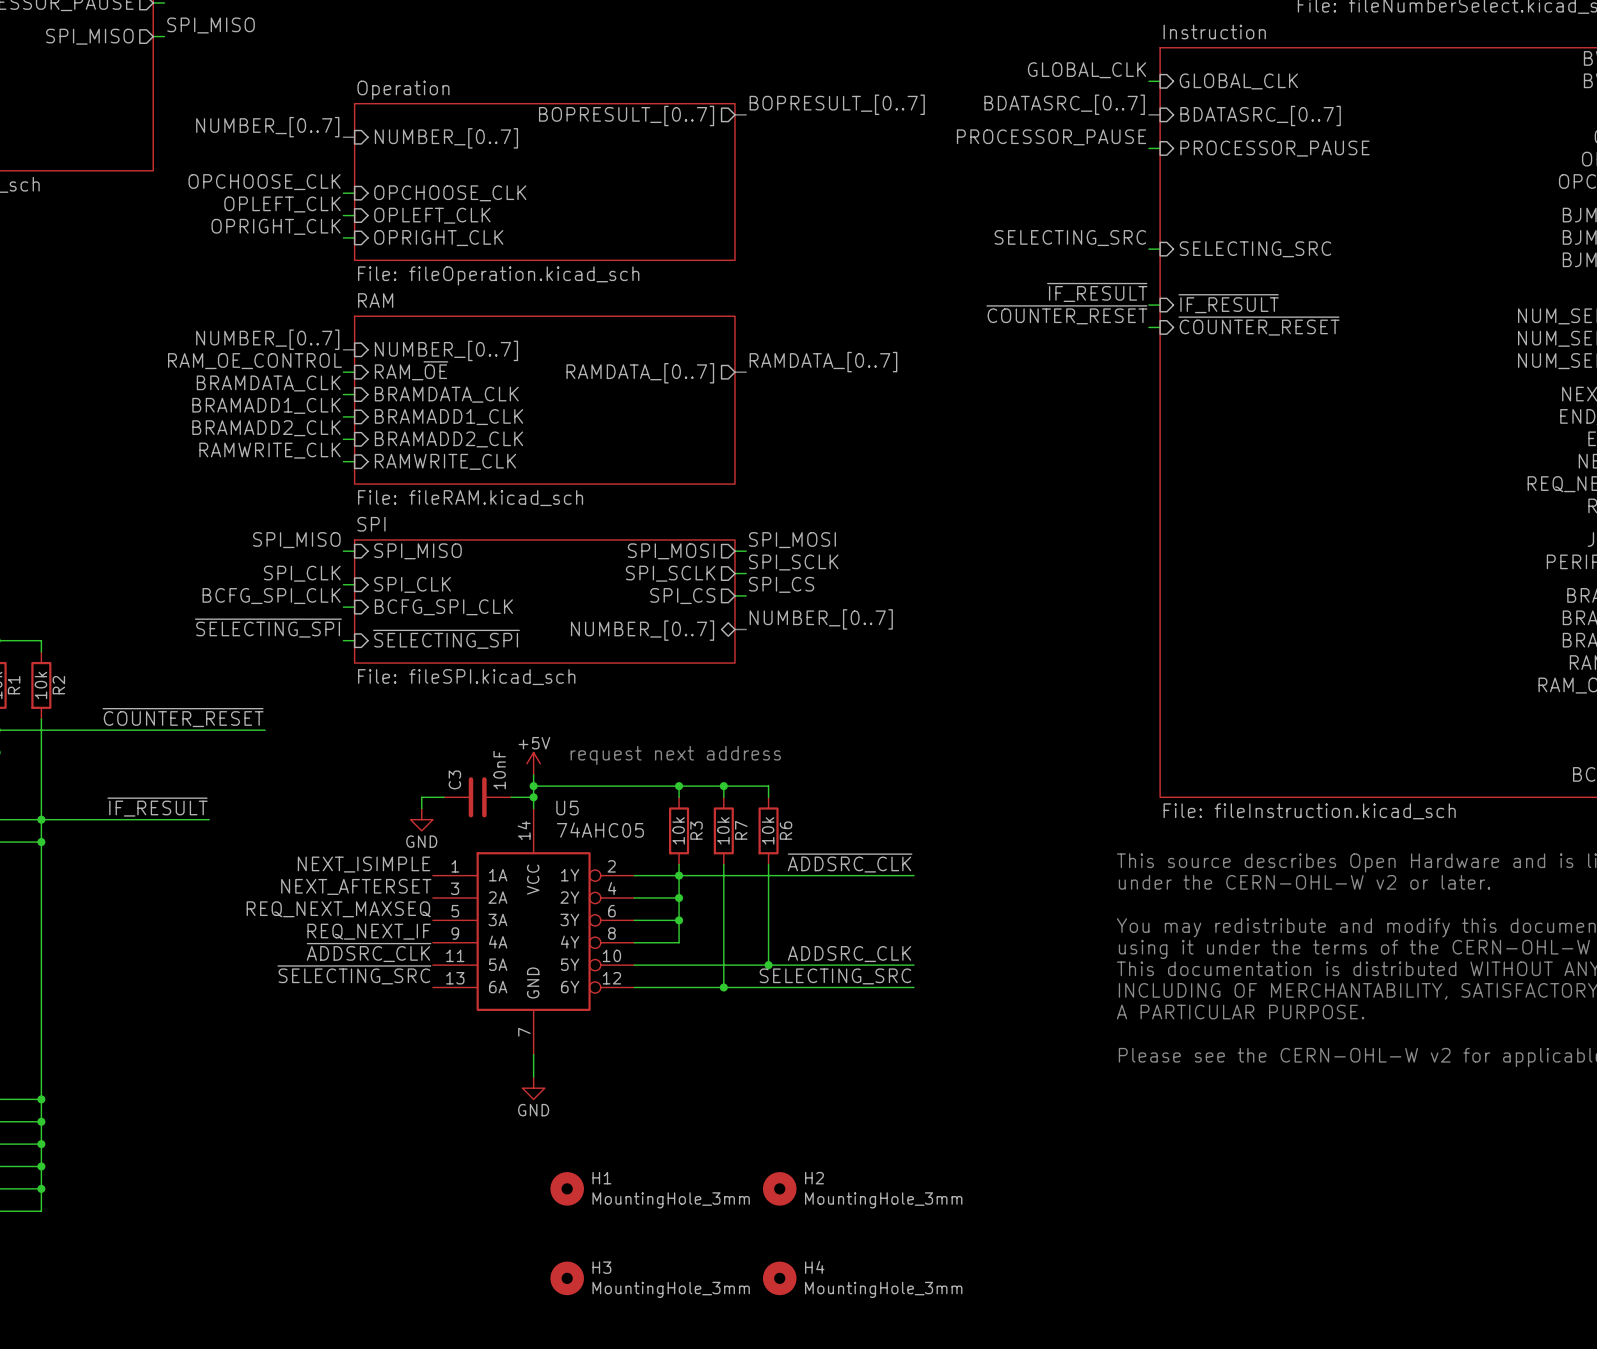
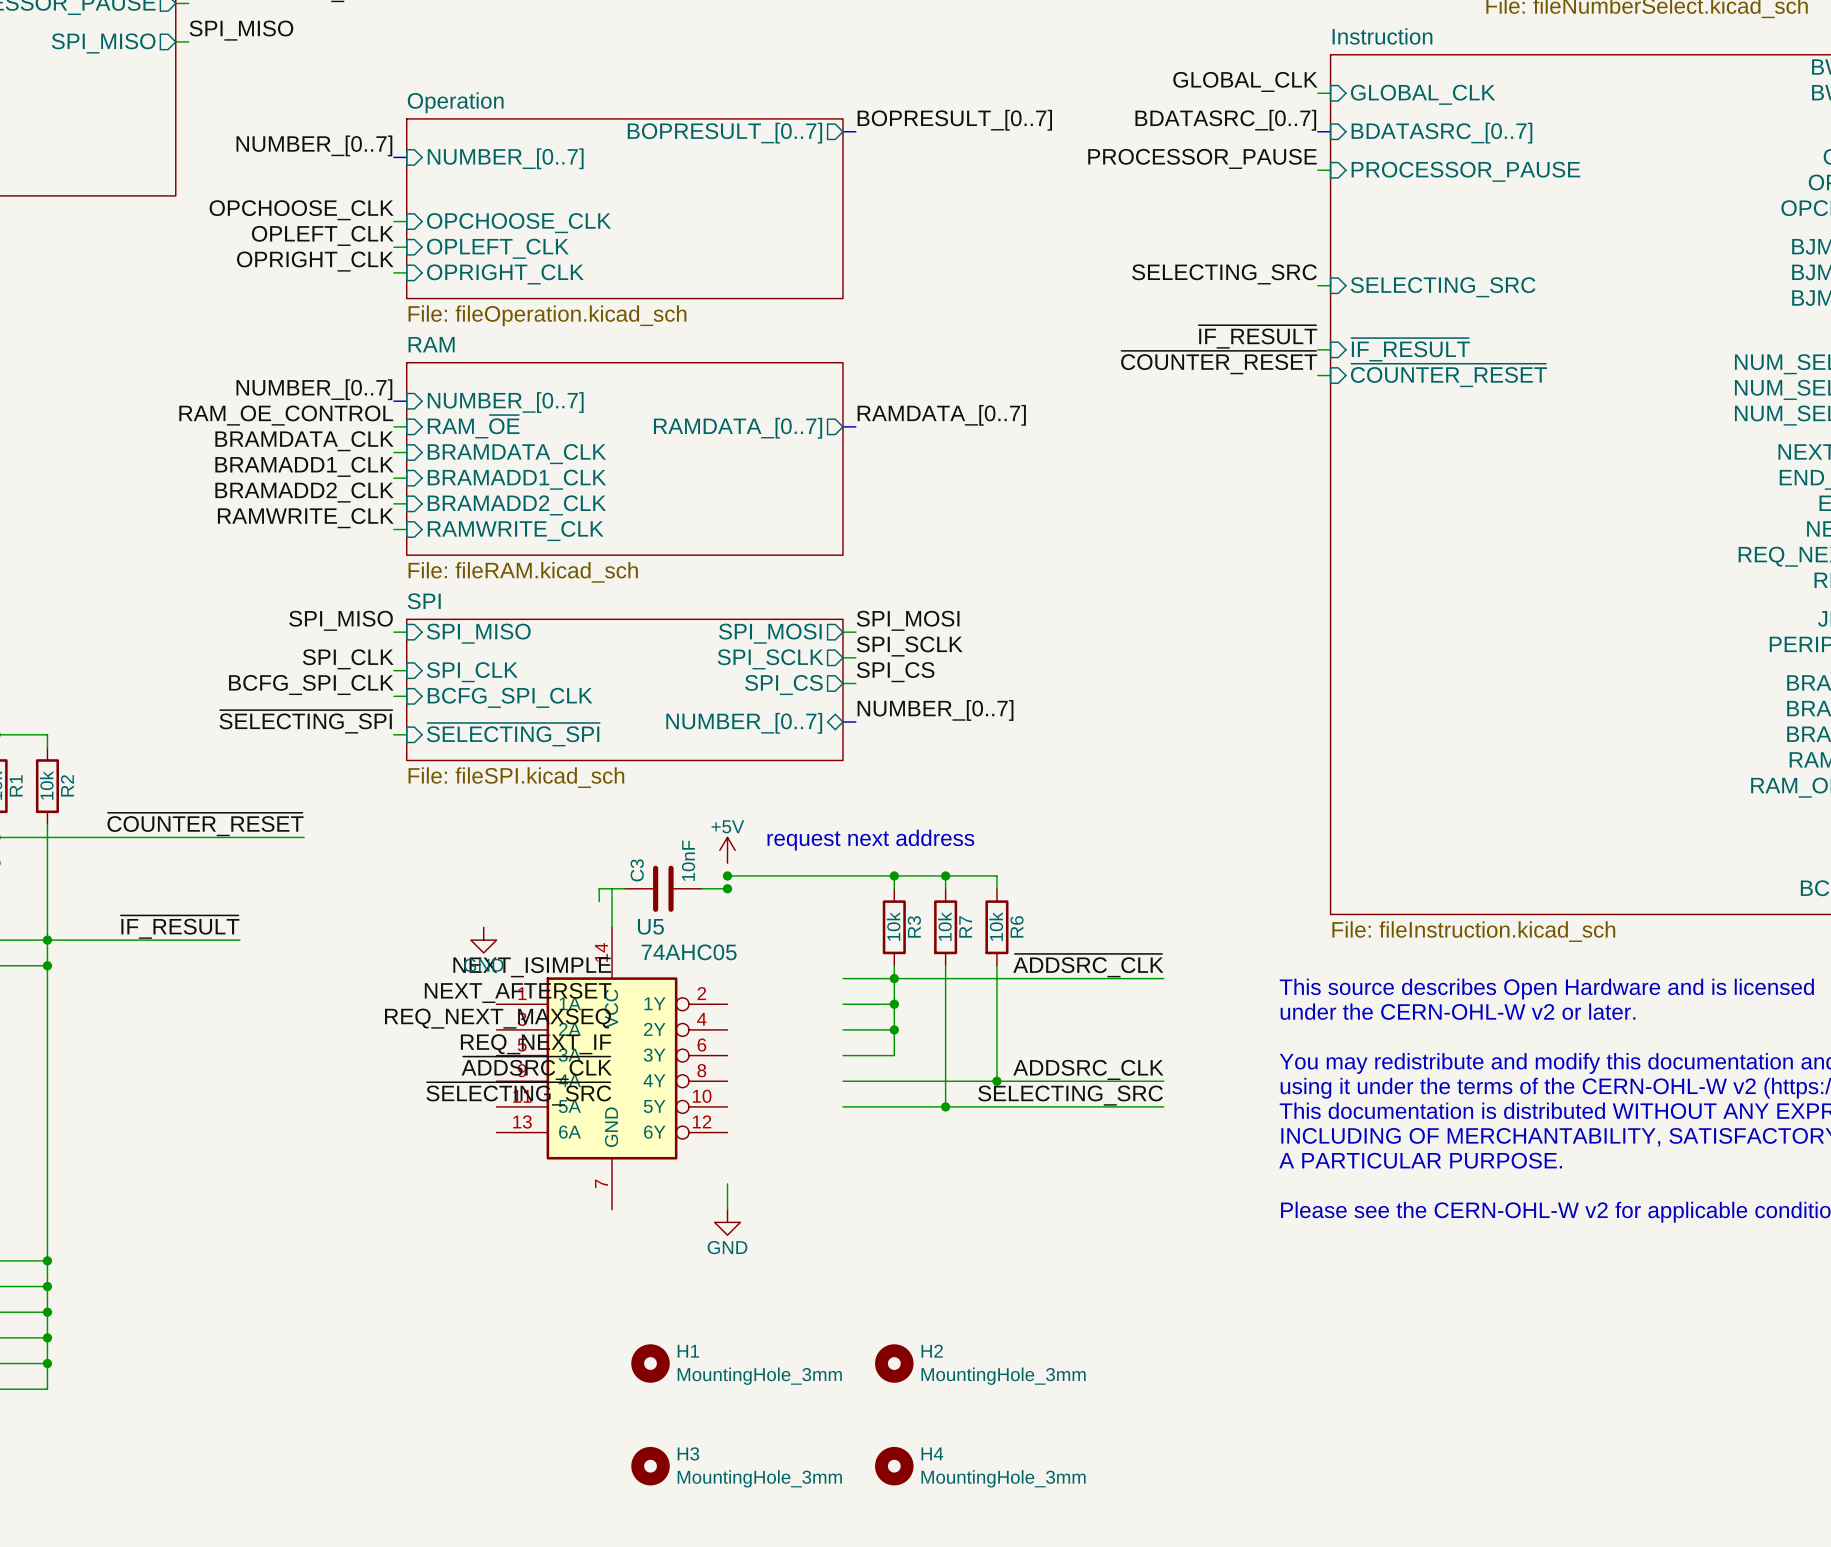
text position: request next address (675, 755) -> request next address (870, 840)
power symbol position: +5V (533, 763) -> +5V (727, 850)
junction: none -> (727, 875)
junction: none -> (894, 875)
junction: none -> (945, 875)
junction: none -> (727, 888)
wire: (533, 786) (768, 786) (768, 797) -> (727, 875) (996, 875) (996, 888)
junction: (533, 786) -> none
wire: (679, 786) (679, 797) -> (894, 875) (894, 888)
junction: (679, 786) -> none
wire: (723, 786) (723, 797) -> (945, 875) (945, 888)
junction: (723, 786) -> none
wire: (444, 797) (421, 797) (421, 808) -> (624, 888) (599, 888) (599, 901)
C3 position: (477, 797) -> (663, 888)
wire: (511, 797) (533, 797) -> (701, 888) (727, 888)
junction: (533, 797) -> none
R3 position: (679, 830) -> (894, 927)
R7 position: (723, 830) -> (945, 927)
R6 position: (768, 830) -> (996, 927)
wire: none -> (842, 978) (1163, 978)
junction: none -> (894, 978)
label position: ~{ADDSRC_CLK} (850, 863) -> ~{ADDSRC_CLK} (1088, 965)
label position: NEXT_ISIMPLE (363, 864) -> NEXT_ISIMPLE (532, 967)
wire: (679, 864) (679, 942) (634, 942) -> (894, 965) (894, 1055) (842, 1055)
wire: (723, 864) (723, 987) -> (945, 965) (945, 1106)
wire: (768, 864) (768, 965) -> (996, 965) (996, 1081)
wire: (634, 875) (734, 875) -> none
junction: (679, 875) -> none
wire: (779, 875) (913, 875) -> none
junction: none -> (894, 1004)
label position: NEXT_AFTERSET (356, 886) -> NEXT_AFTERSET (518, 992)
wire: (634, 897) (679, 897) -> none
junction: (679, 897) -> none
junction: none -> (894, 1029)
label position: REQ_NEXT_MAXSEQ (338, 909) -> REQ_NEXT_MAXSEQ (497, 1018)
wire: (634, 920) (679, 920) -> (842, 1029) (894, 1029)
junction: (679, 920) -> none
label position: REQ_NEXT_IF (369, 931) -> REQ_NEXT_IF (536, 1044)
junction: none -> (996, 1081)
label position: ~{ADDSRC_CLK} (369, 952) -> ~{ADDSRC_CLK} (536, 1068)
label position: ADDSRC_CLK (849, 954) -> ADDSRC_CLK (1088, 1069)
wire: (634, 965) (734, 965) -> none
junction: (768, 965) -> none
junction: none -> (945, 1106)
wire: none -> (1048, 1106) (1163, 1106)
label position: ~{SELECTING_SRC} (354, 974) -> ~{SELECTING_SRC} (518, 1093)
label position: SELECTING_SRC (835, 976) -> SELECTING_SRC (1070, 1095)
wire: (634, 987) (913, 987) -> (842, 1081) (1163, 1081)
junction: (723, 987) -> none
wire: (533, 1054) (533, 1076) -> (727, 1183) (727, 1209)
power symbol position: GND (533, 1088) -> GND (727, 1222)

